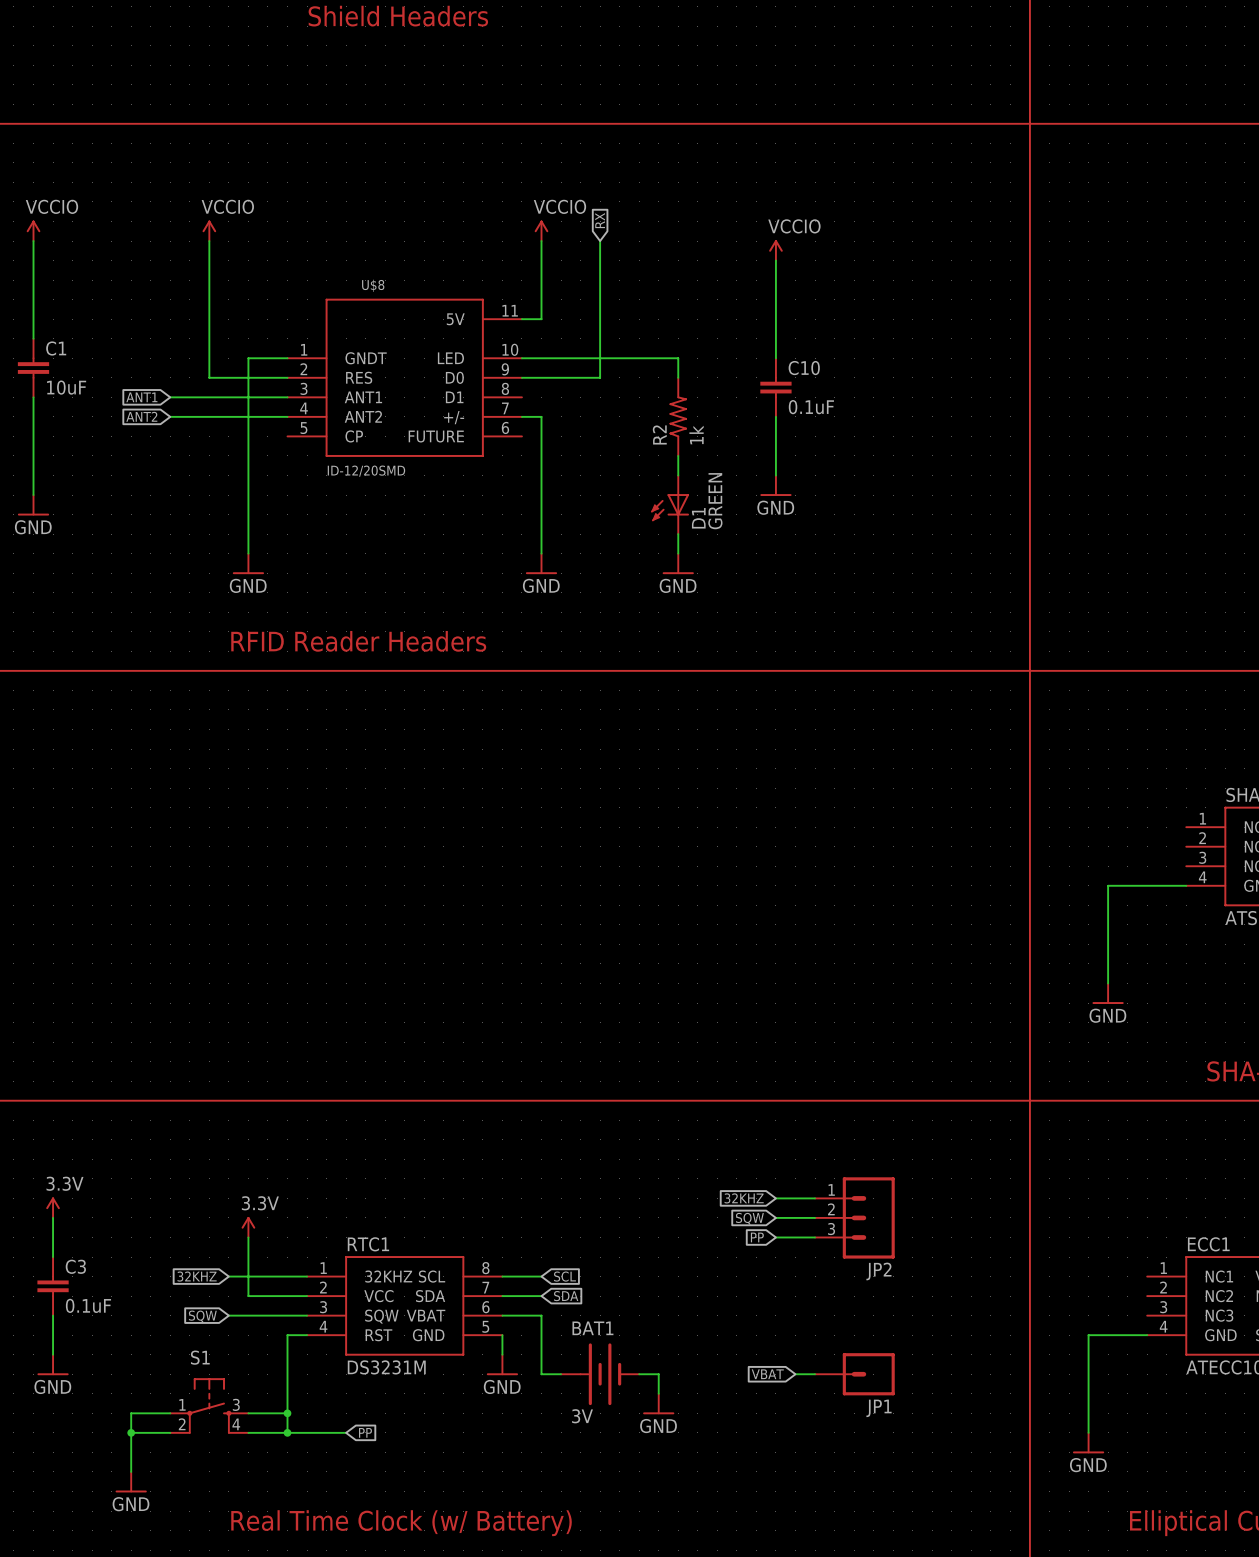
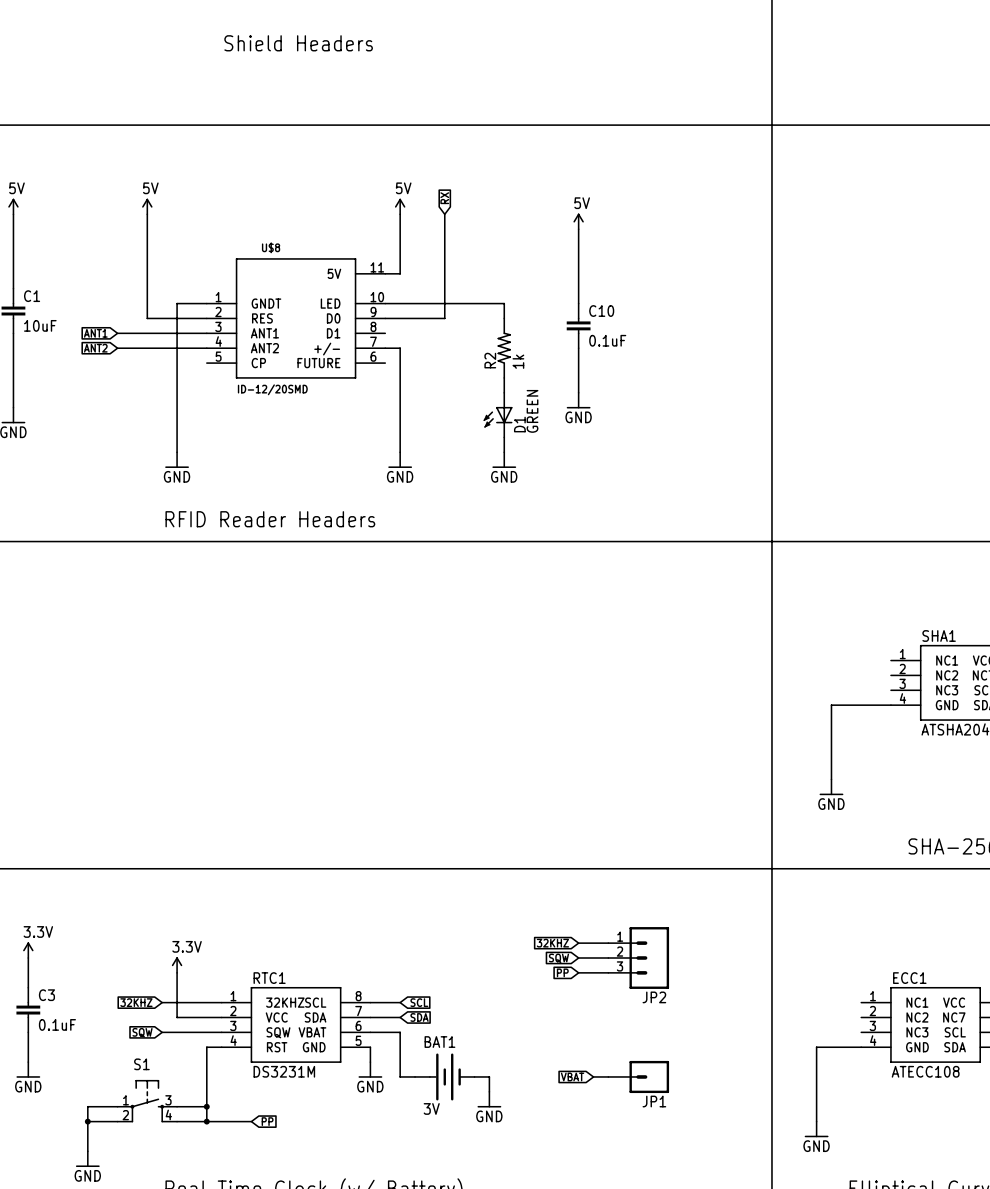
power symbol: VCCIO (33, 230) -> 5V (13, 206)
power symbol: VCCIO (209, 230) -> 5V (147, 206)
power symbol: VCCIO (541, 230) -> 5V (400, 206)
power symbol: VCCIO (775, 250) -> 5V (578, 221)

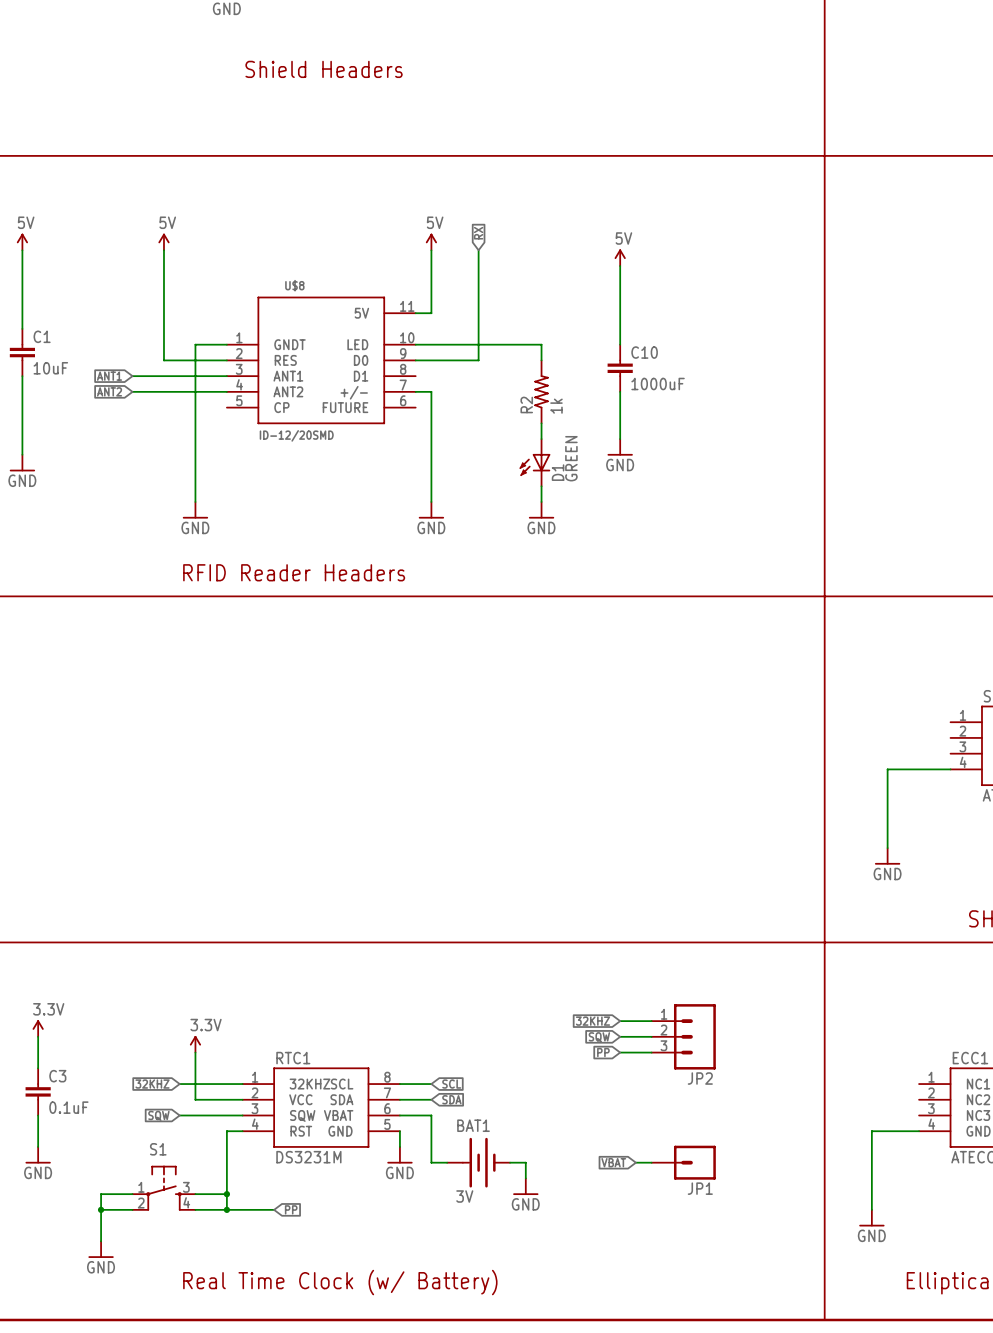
C10 value: 0.1uF (607, 340) -> 1000uF (658, 384)

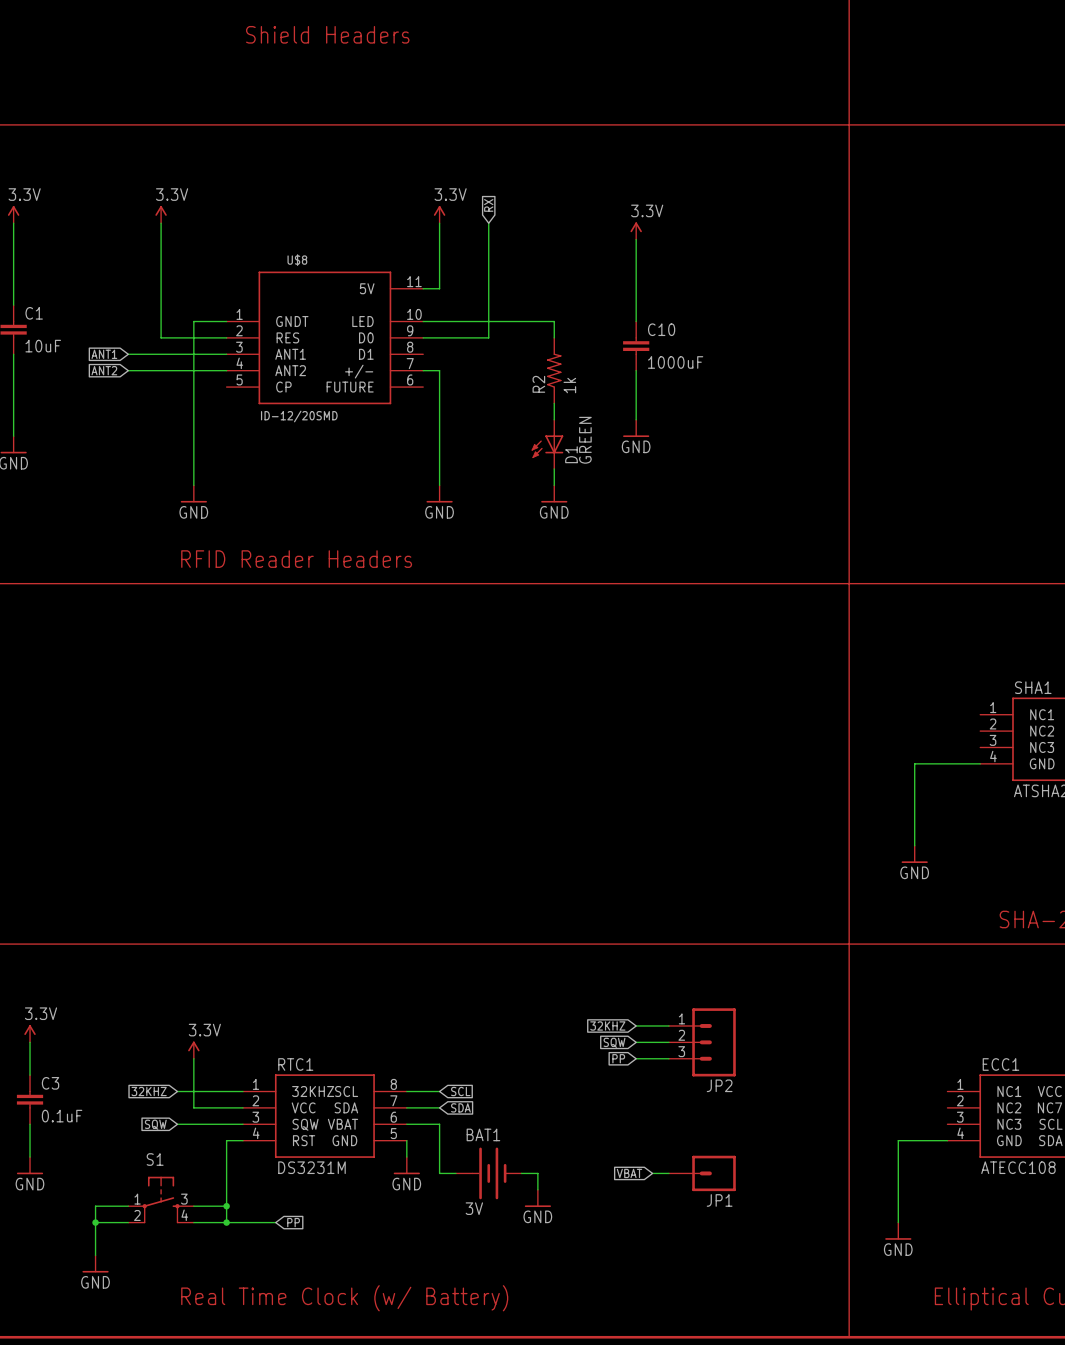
power symbol: 5V (22, 242) -> 3.3V (13, 214)
power symbol: 5V (163, 242) -> 3.3V (161, 214)
power symbol: 5V (431, 242) -> 3.3V (439, 214)
power symbol: 5V (620, 257) -> 3.3V (636, 231)

